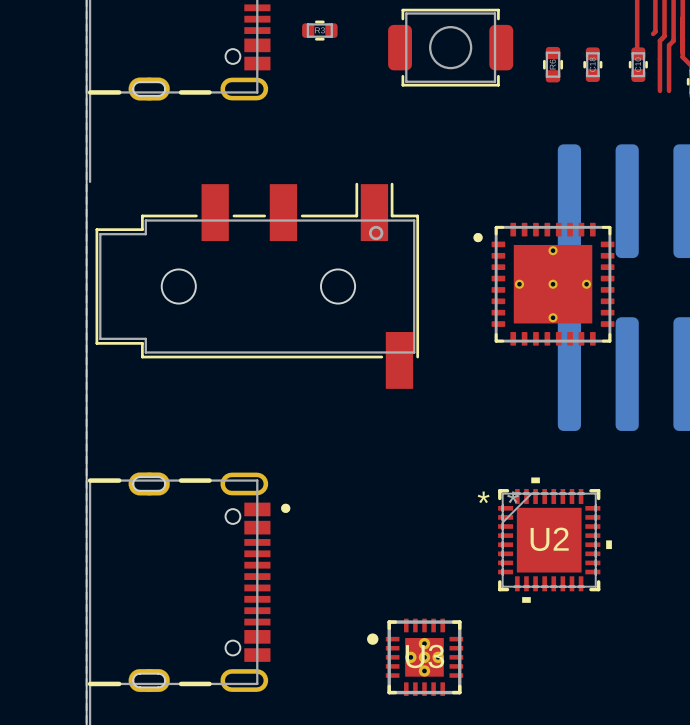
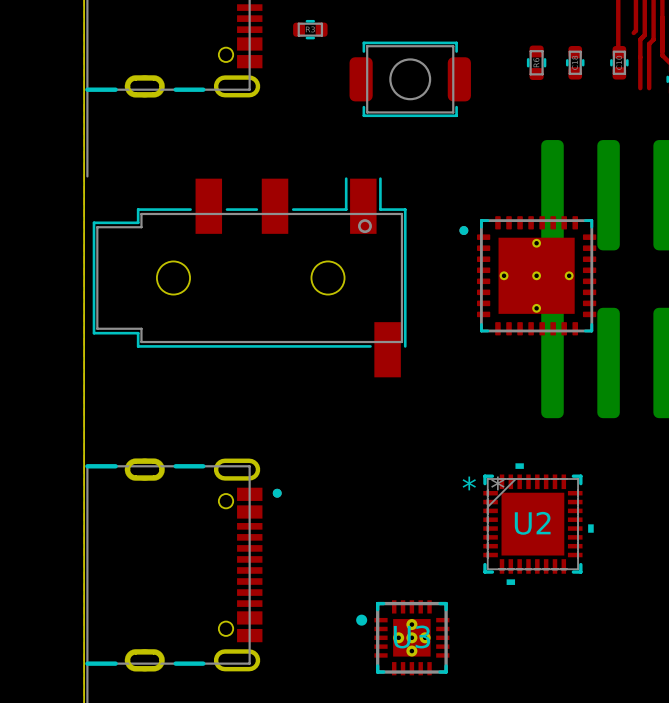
part position: (450, 47) -> (410, 79)

